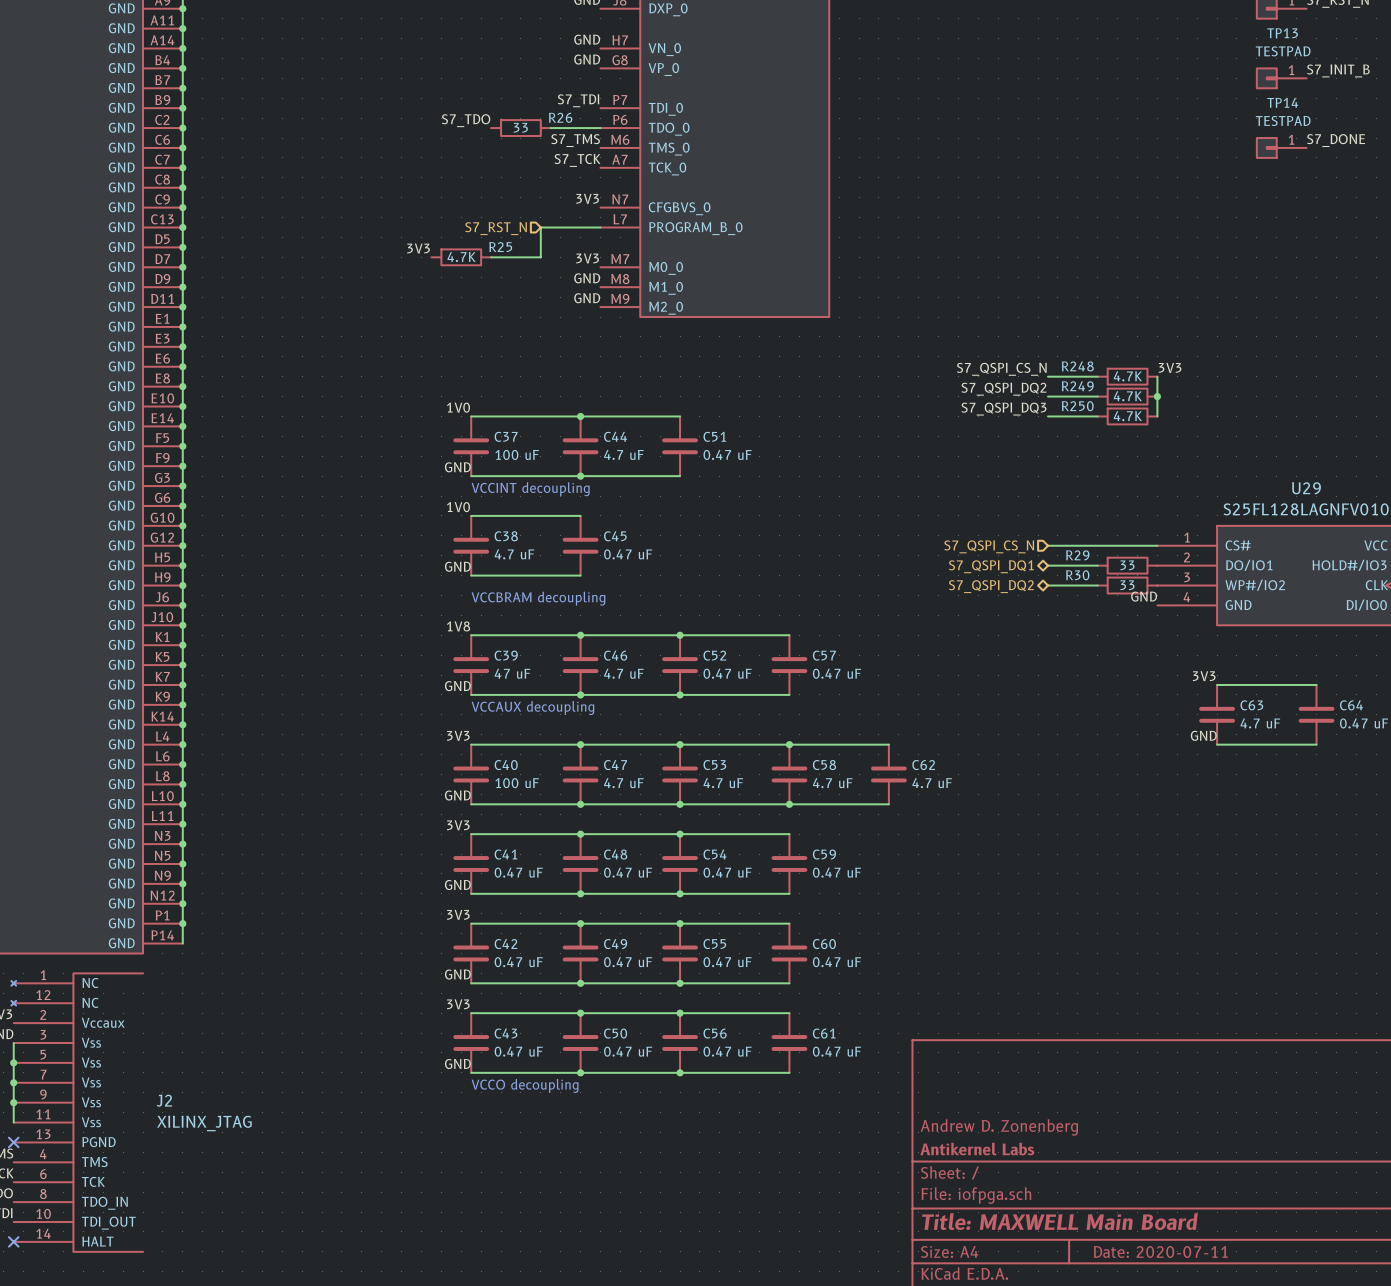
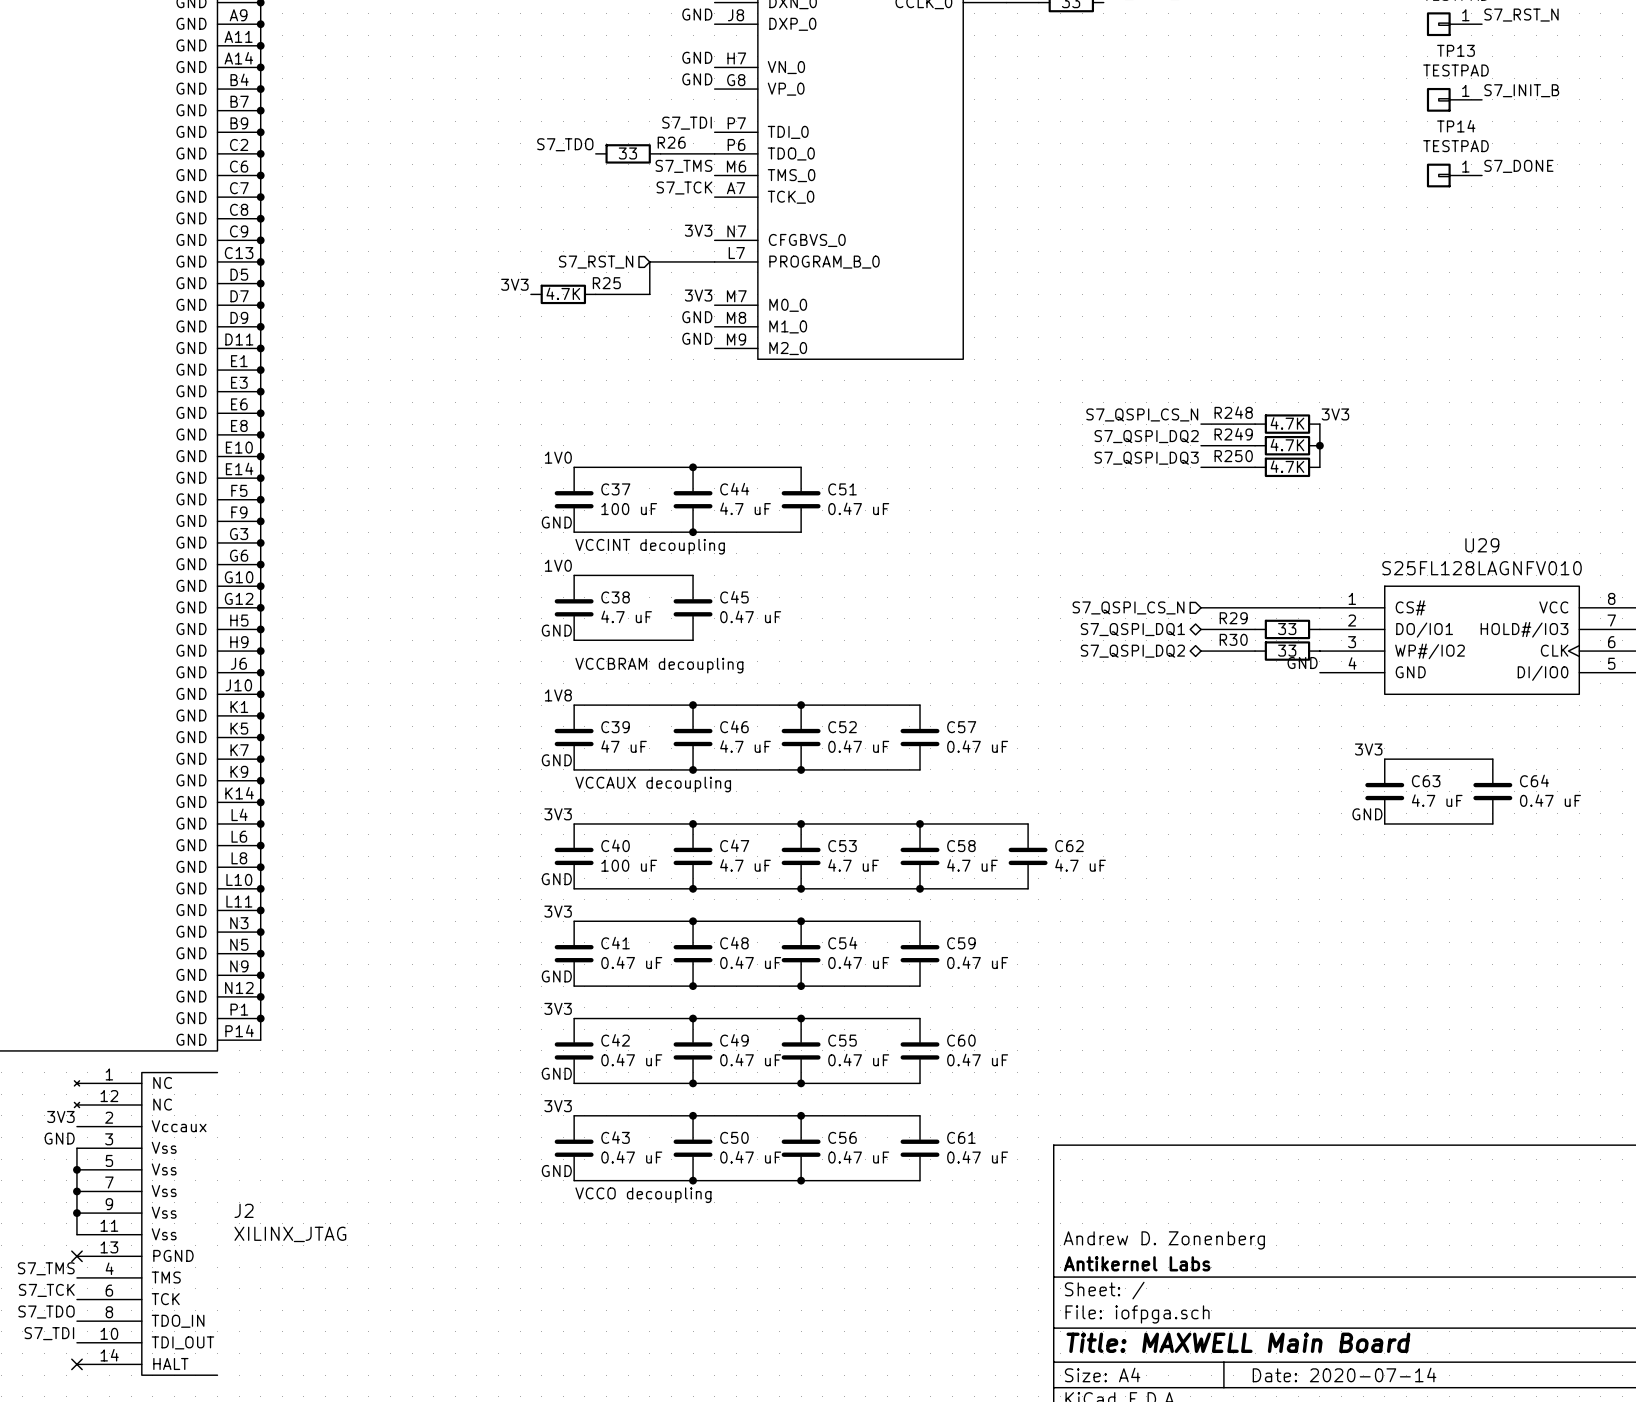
title block: Date: 2020-07-11 (1160, 1252) -> Date: 2020-07-14 (1344, 1374)

